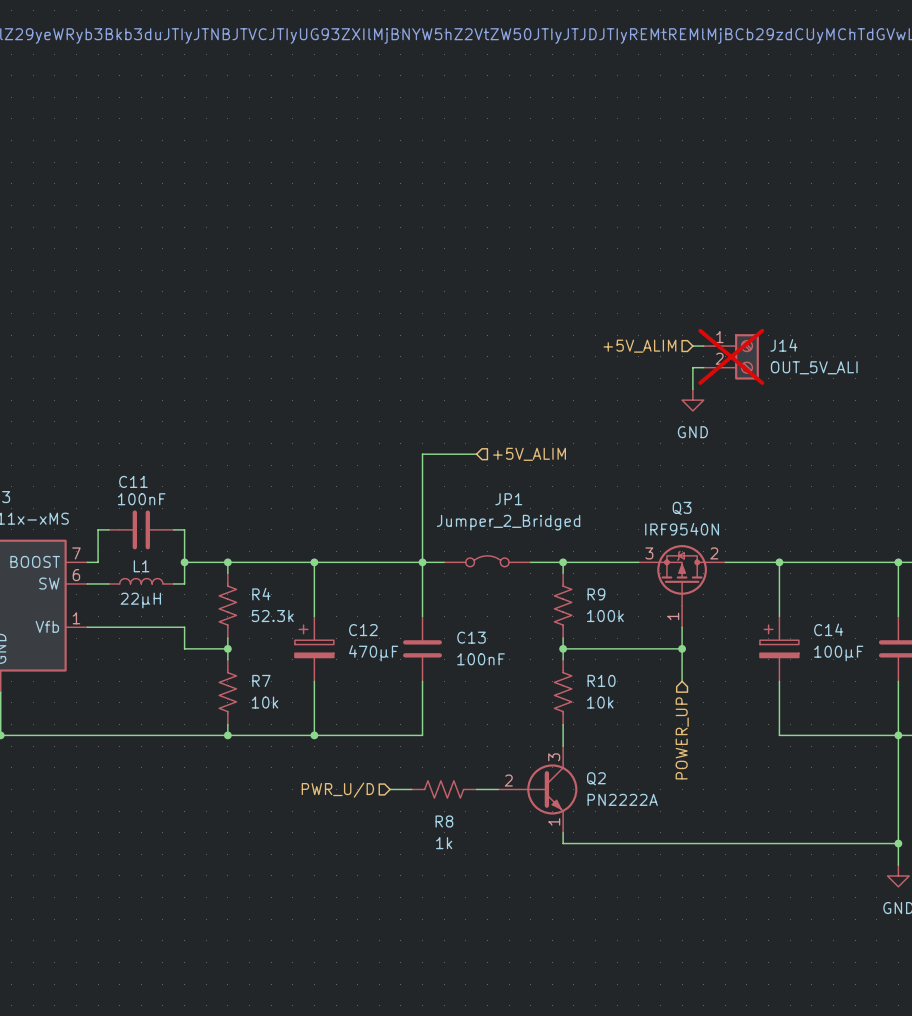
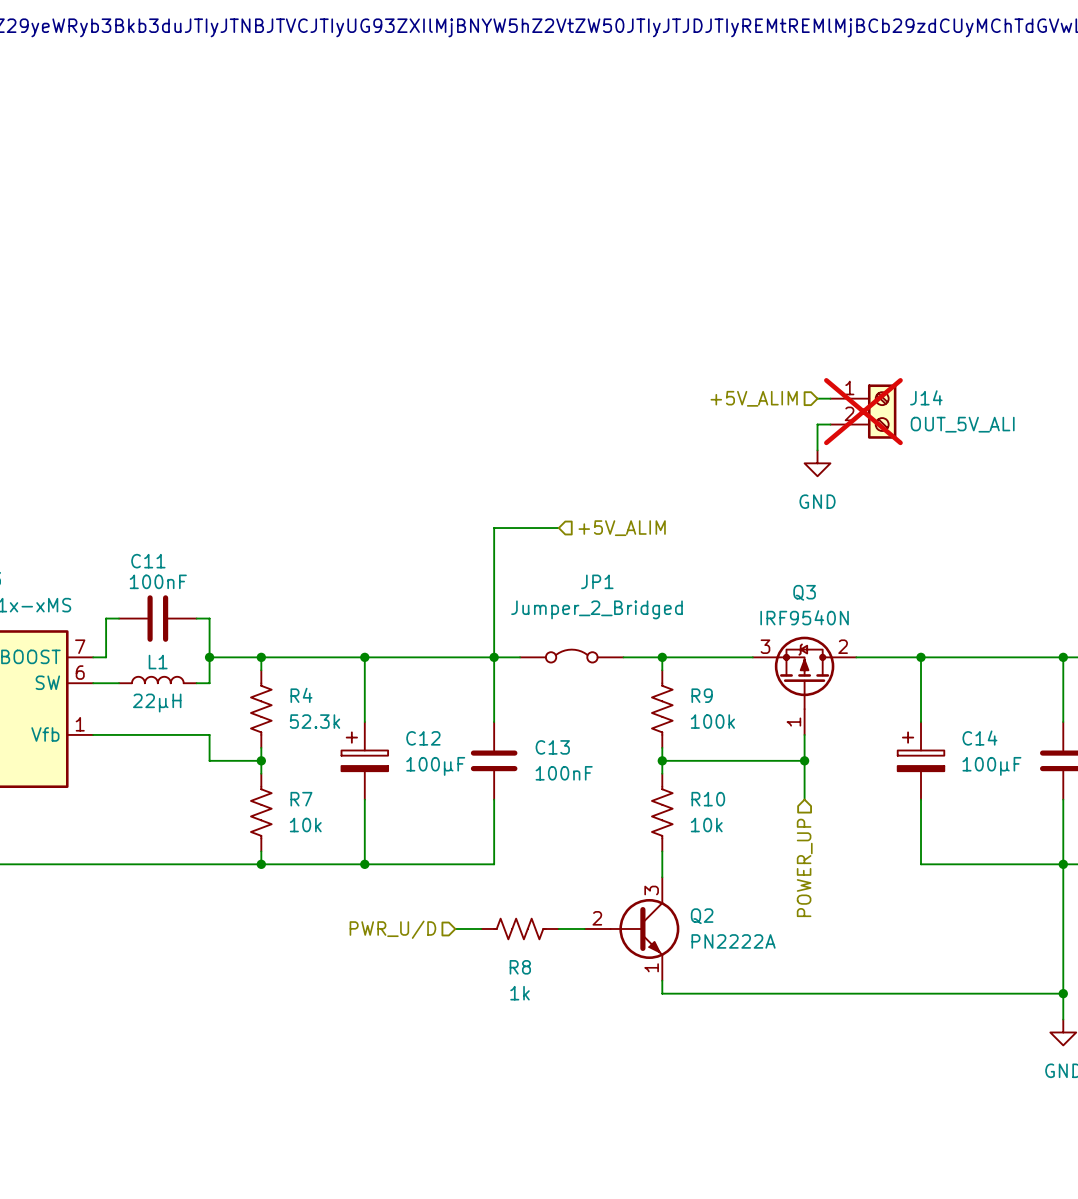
C12 value: 470µF (373, 653) -> 100µF (435, 766)

